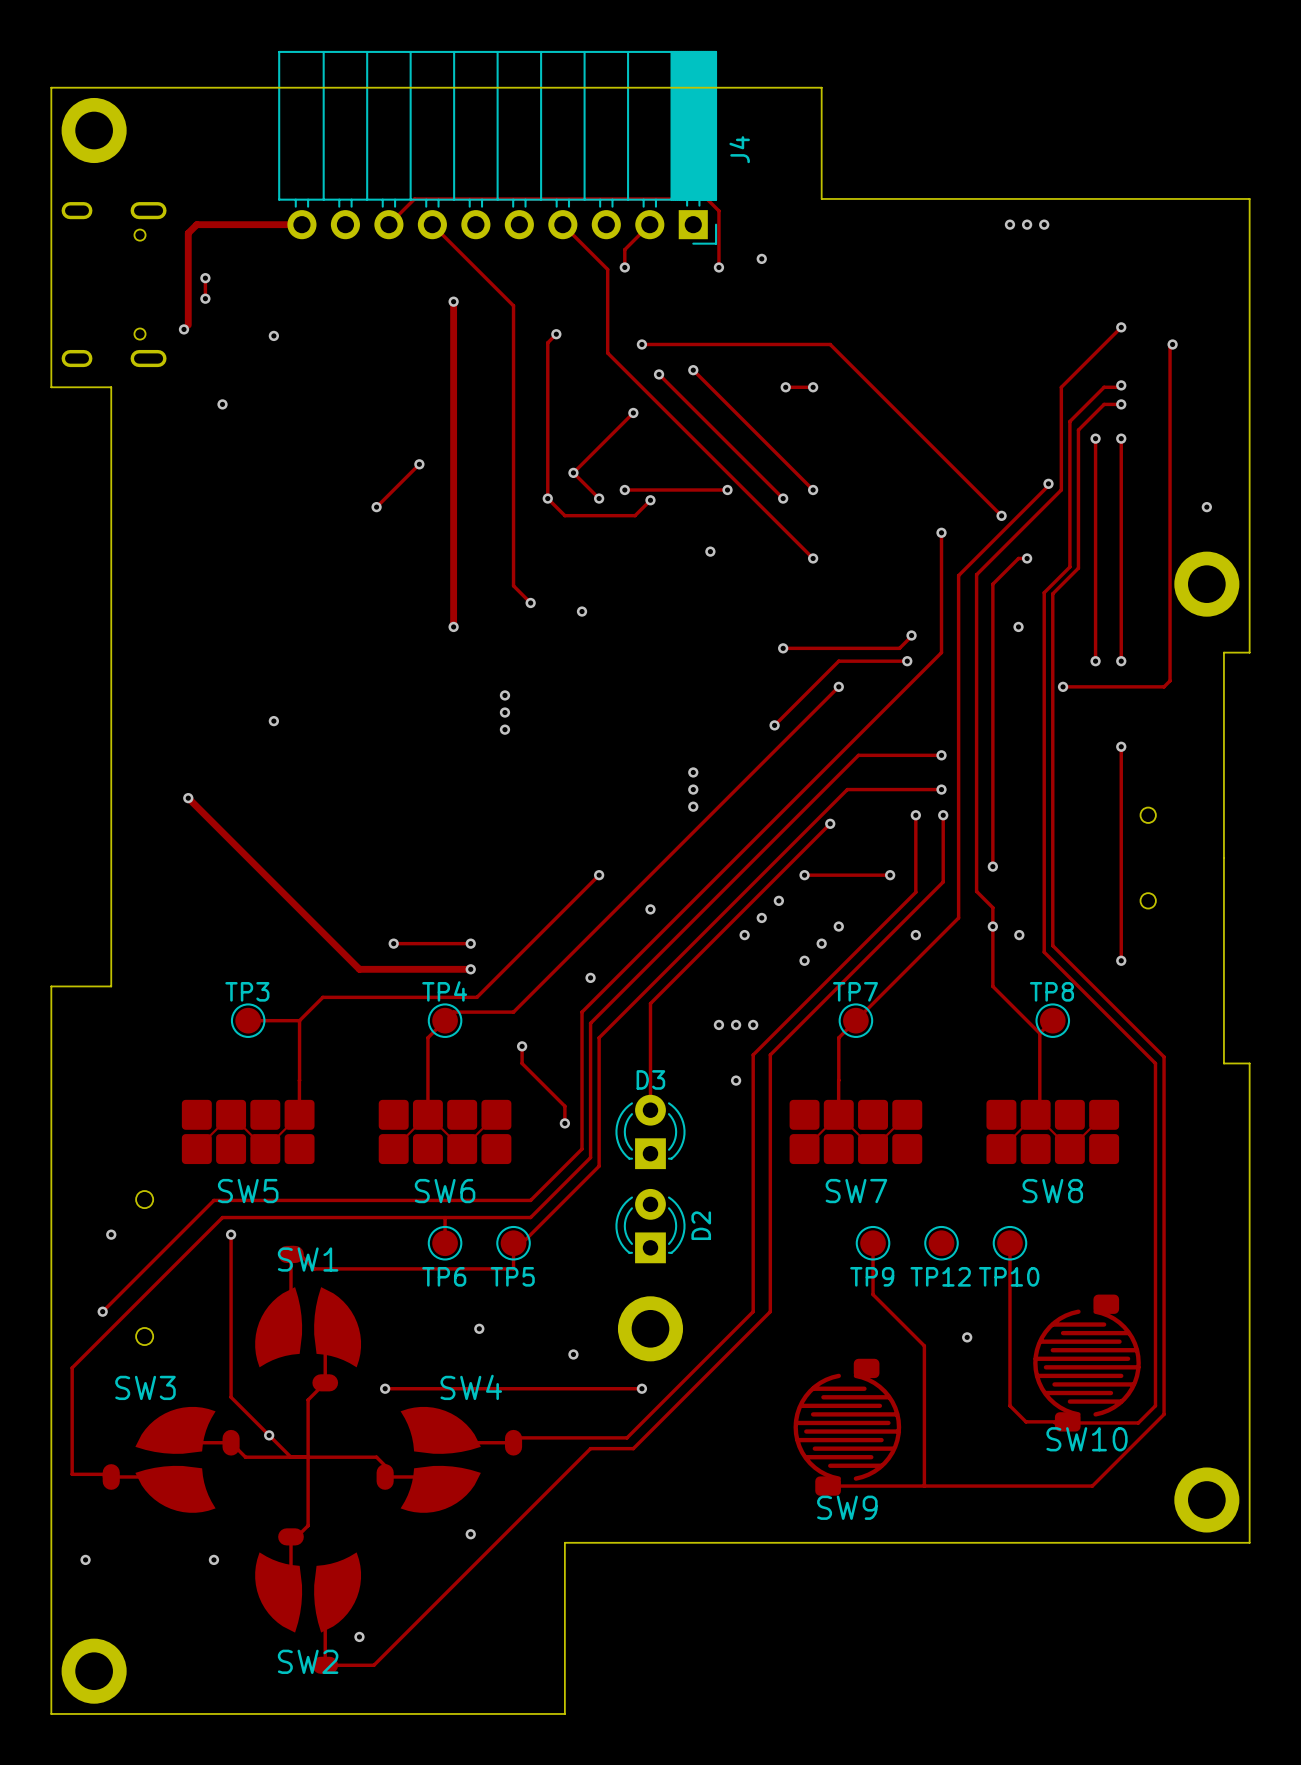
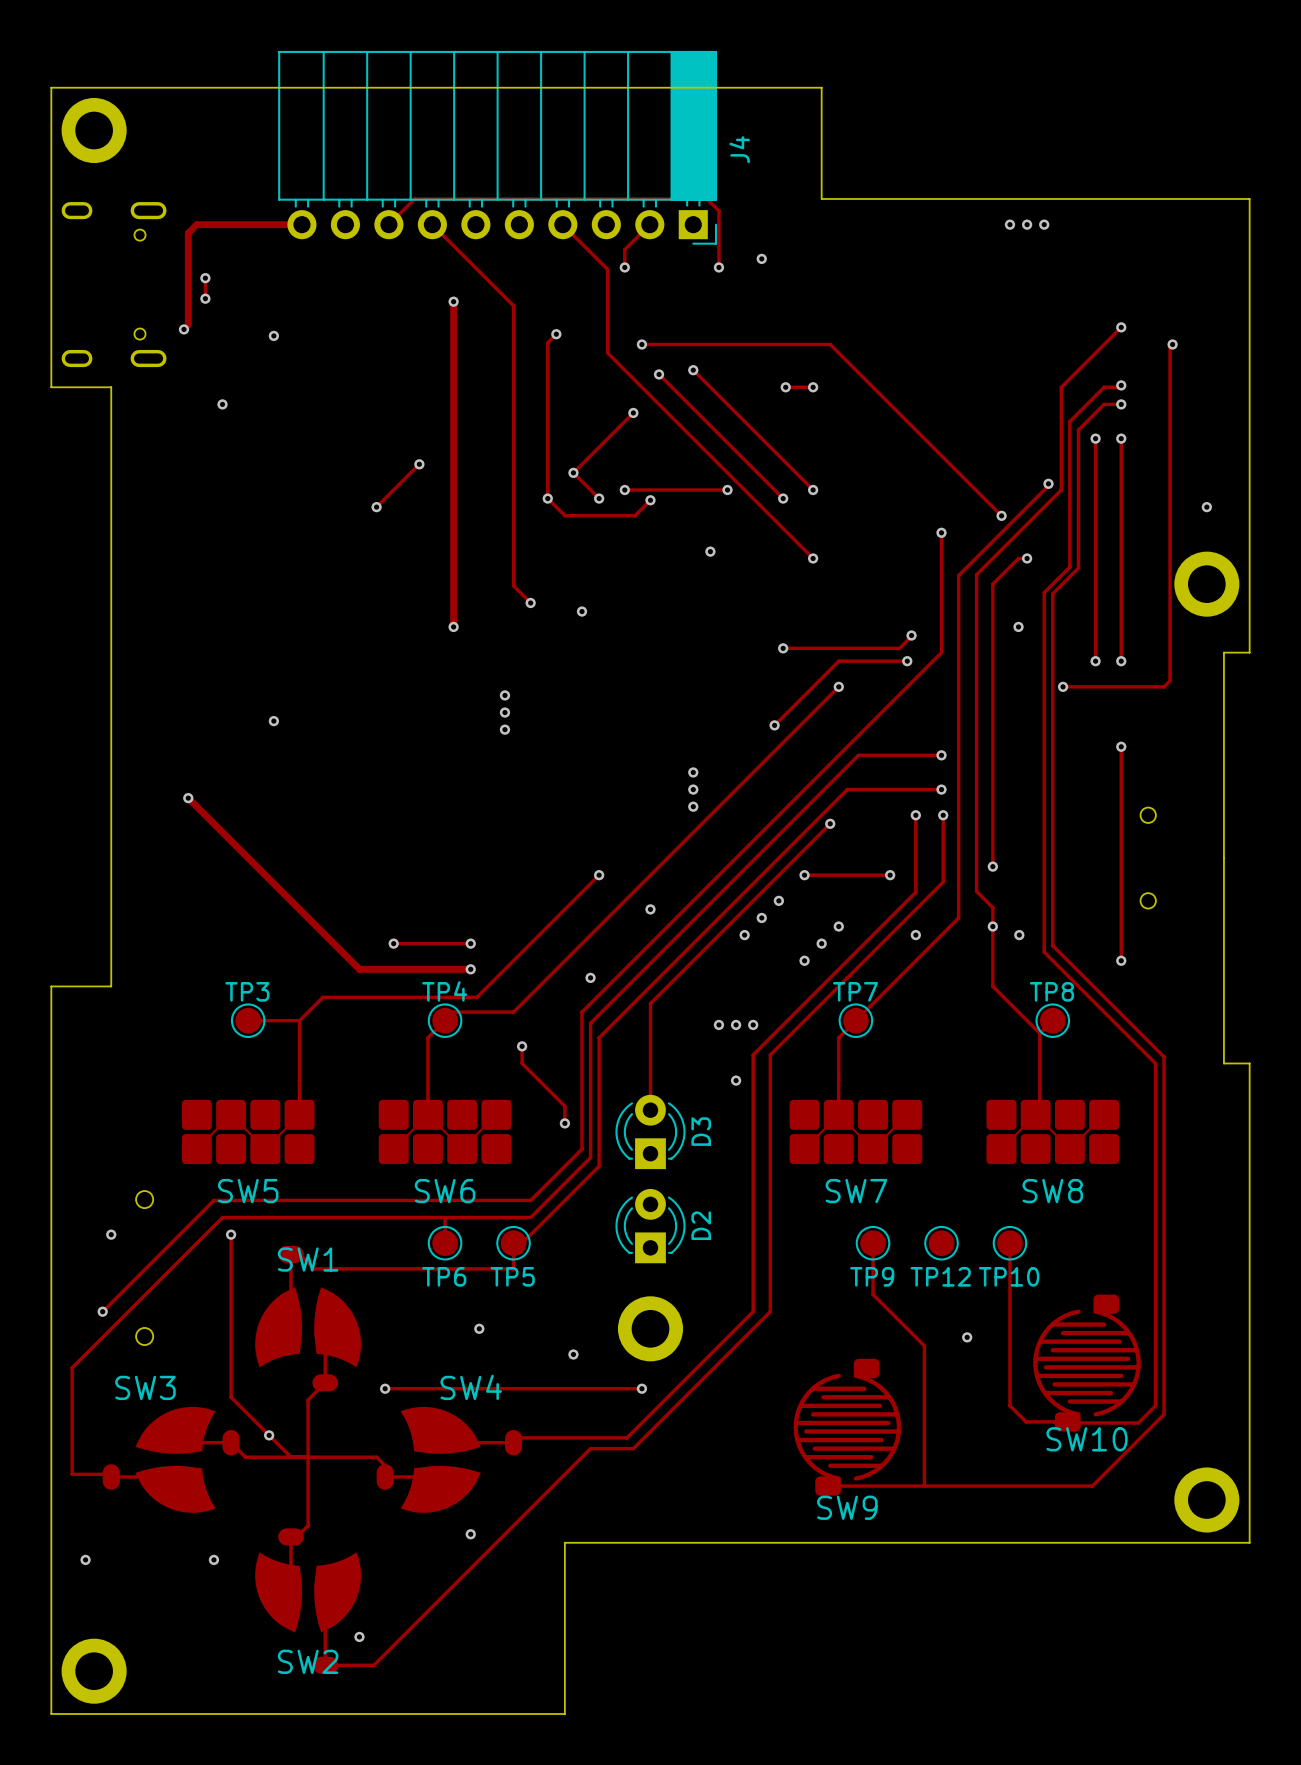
D3 name rotation: 0° (650, 1079) -> 90° counterclockwise (701, 1131)
D3 name position: D3 (650, 1079) -> D3 (701, 1131)

